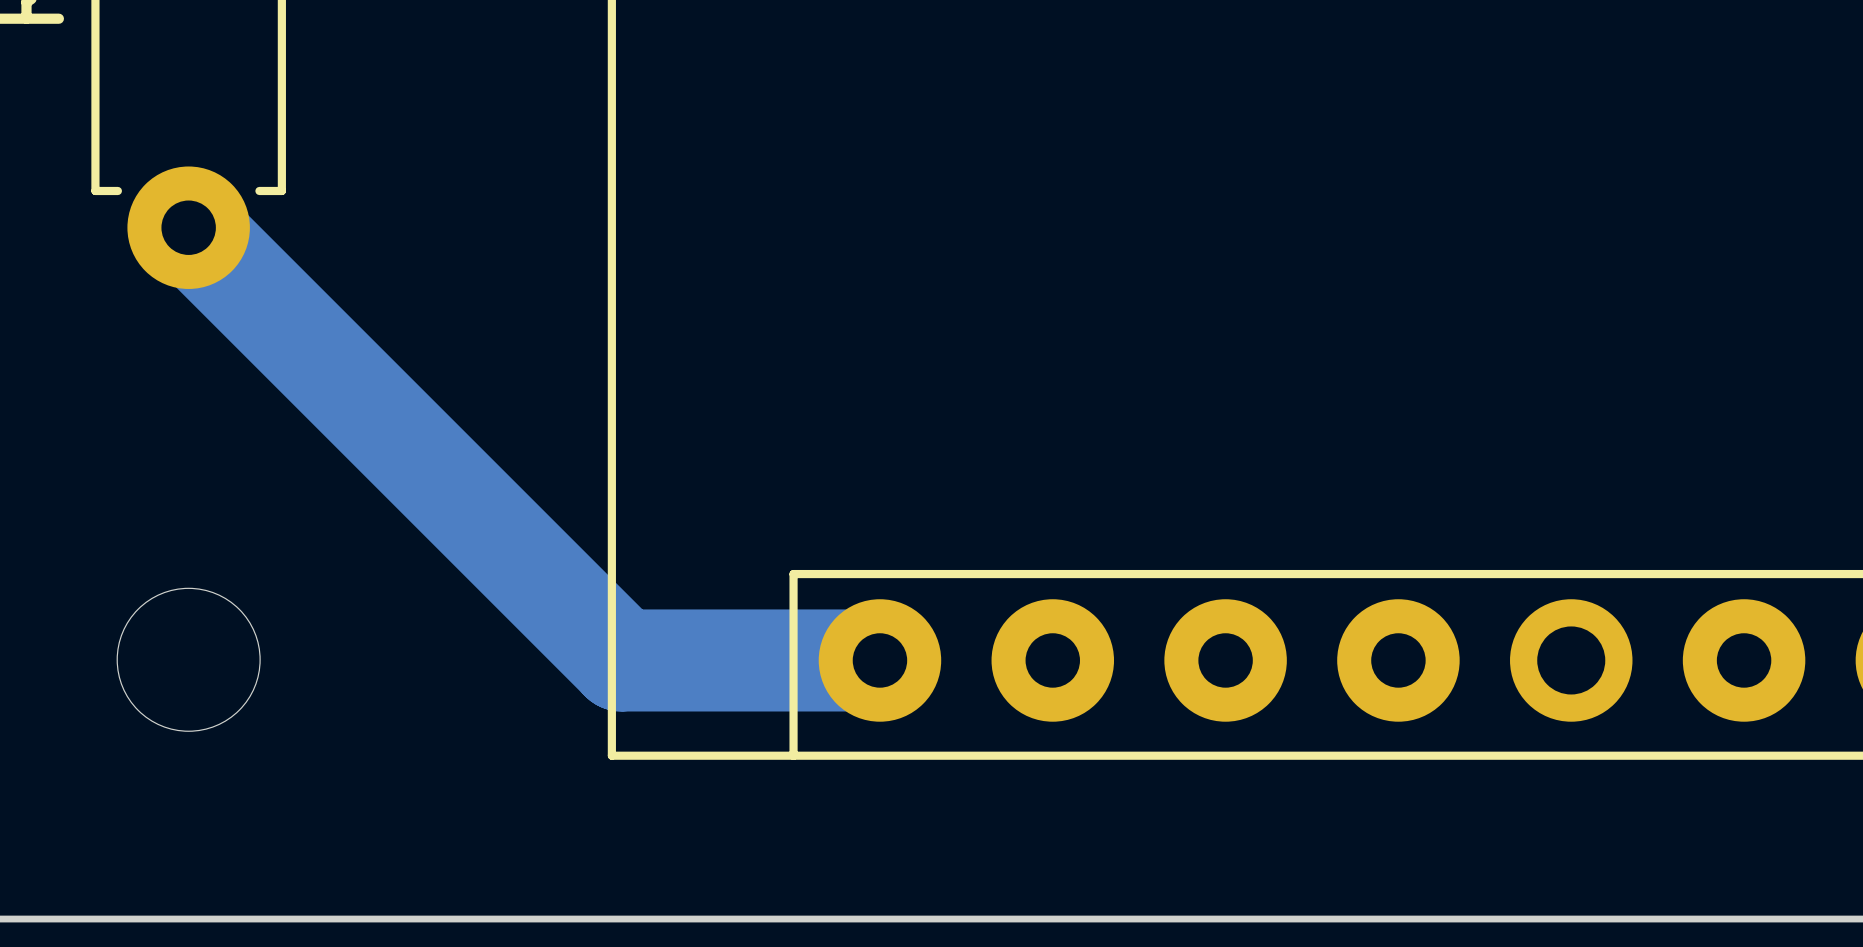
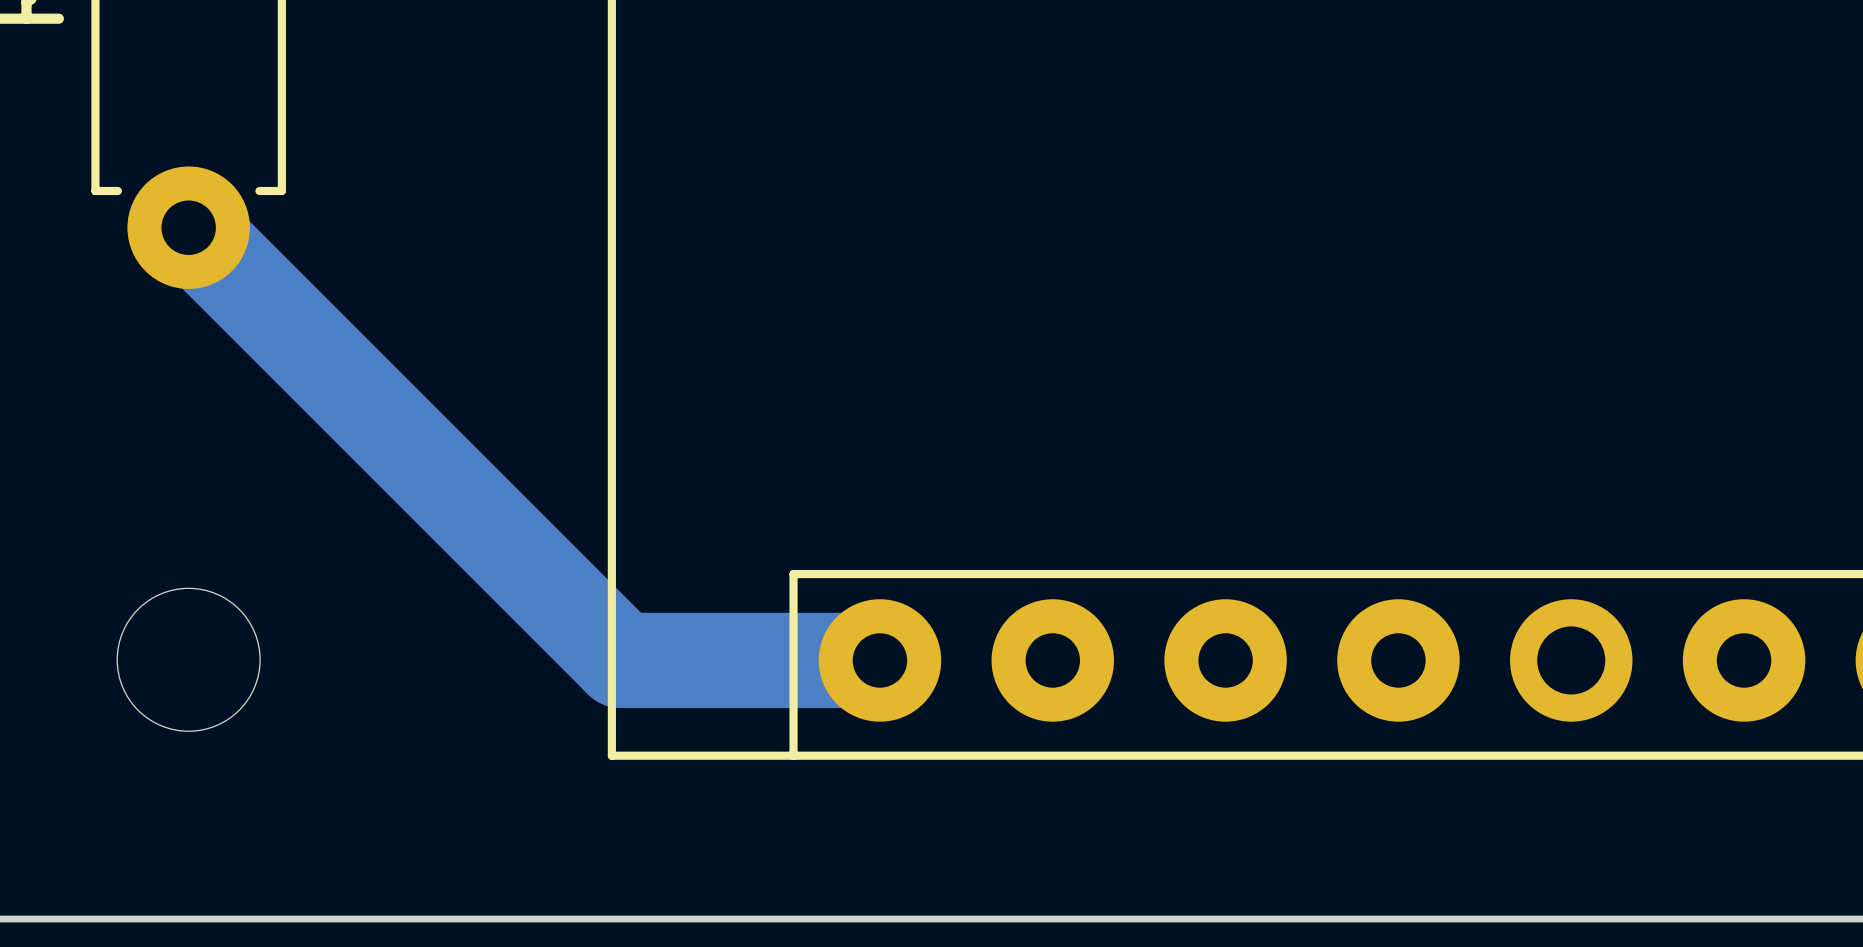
bottom track width: thick (188, 227) (621, 660) (879, 660) -> thin (188, 227) (621, 660) (879, 660)

